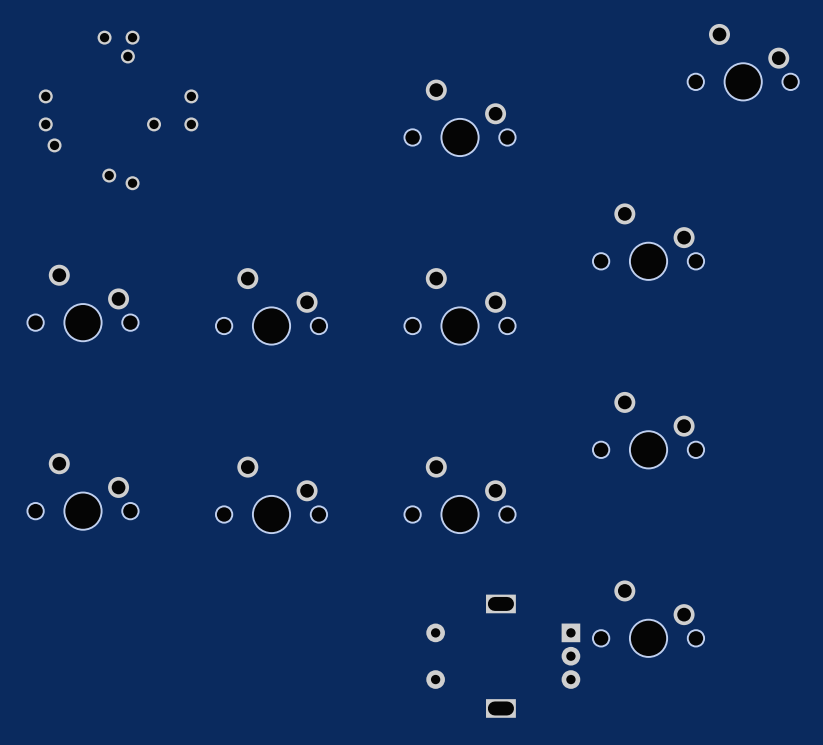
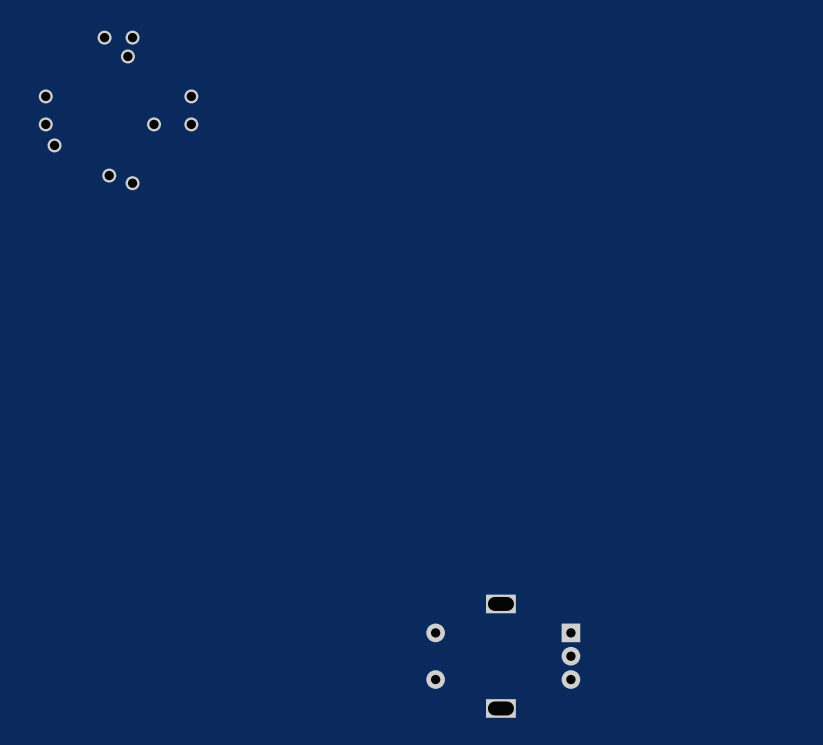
part: (743, 62) -> none
part: (460, 117) -> none
part: (648, 241) -> none
part: (83, 302) -> none
part: (271, 306) -> none
part: (460, 306) -> none
part: (648, 430) -> none
part: (83, 491) -> none
part: (271, 494) -> none
part: (460, 494) -> none
part: (648, 618) -> none

